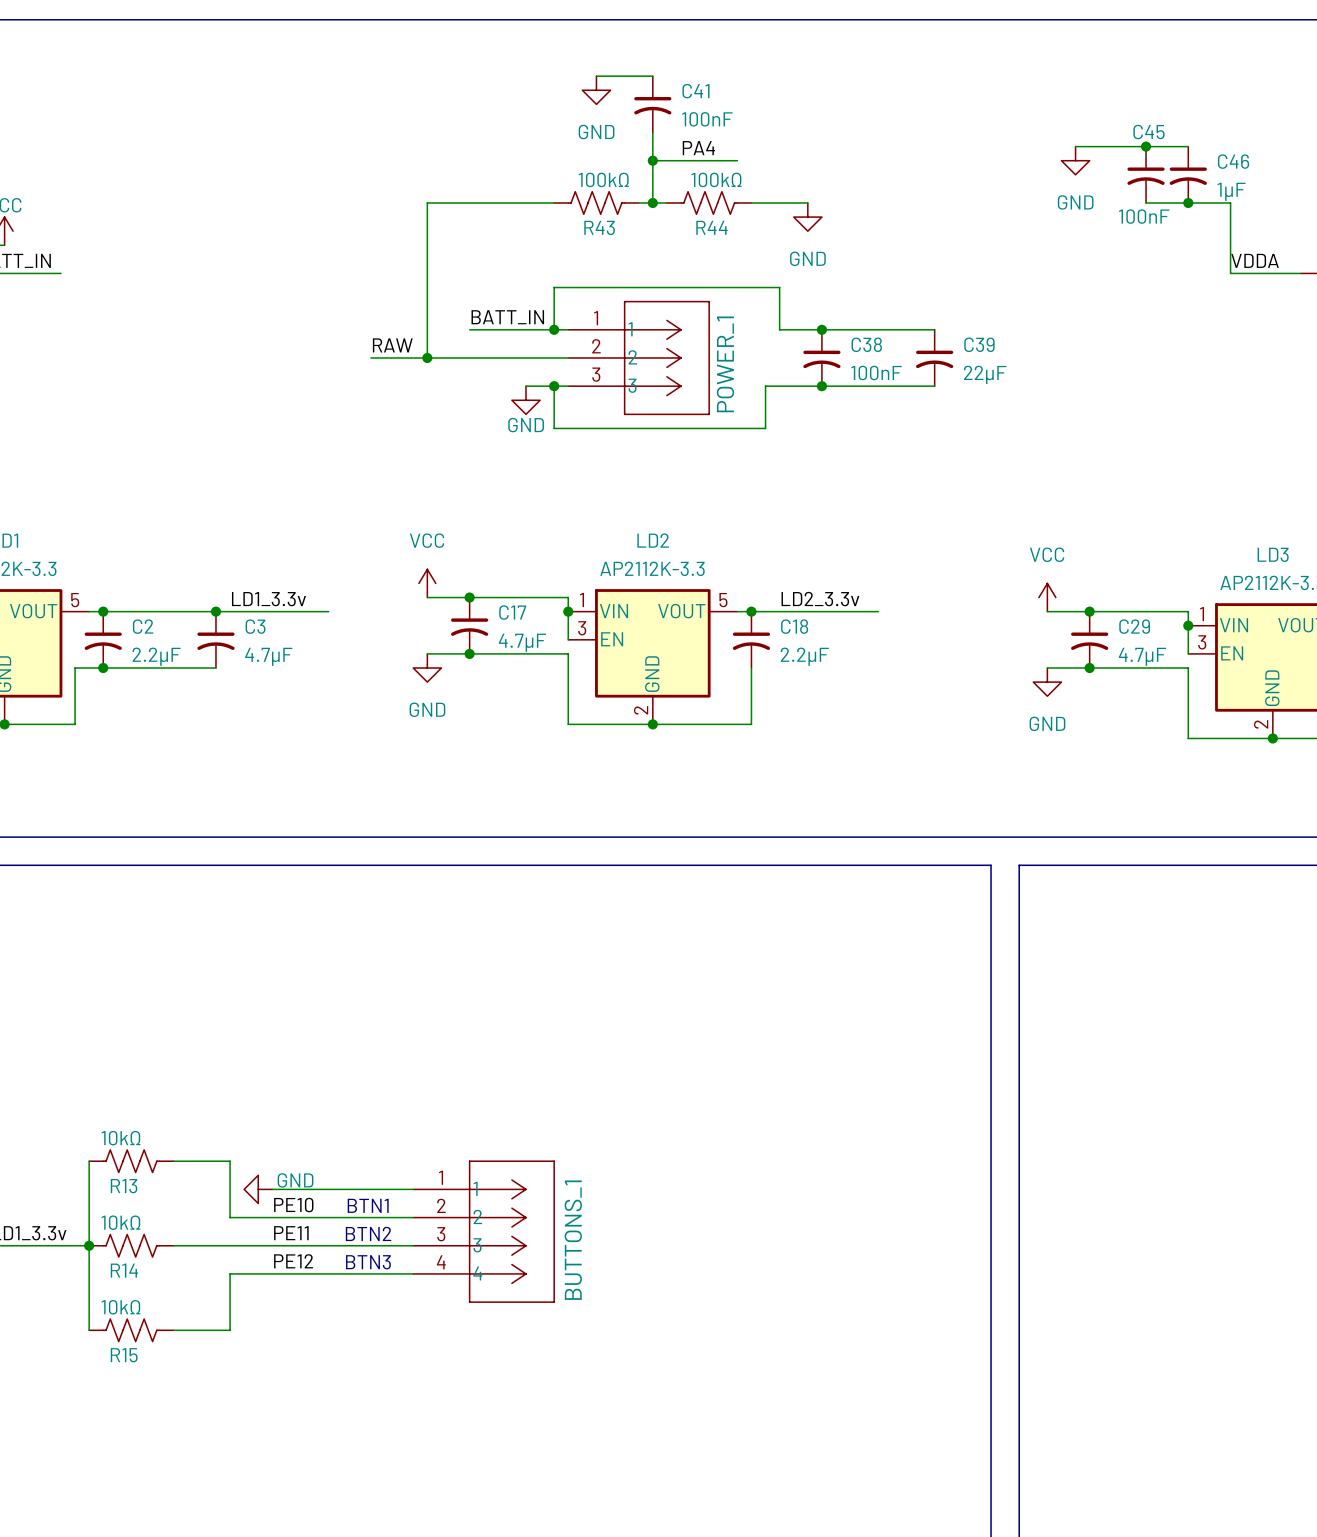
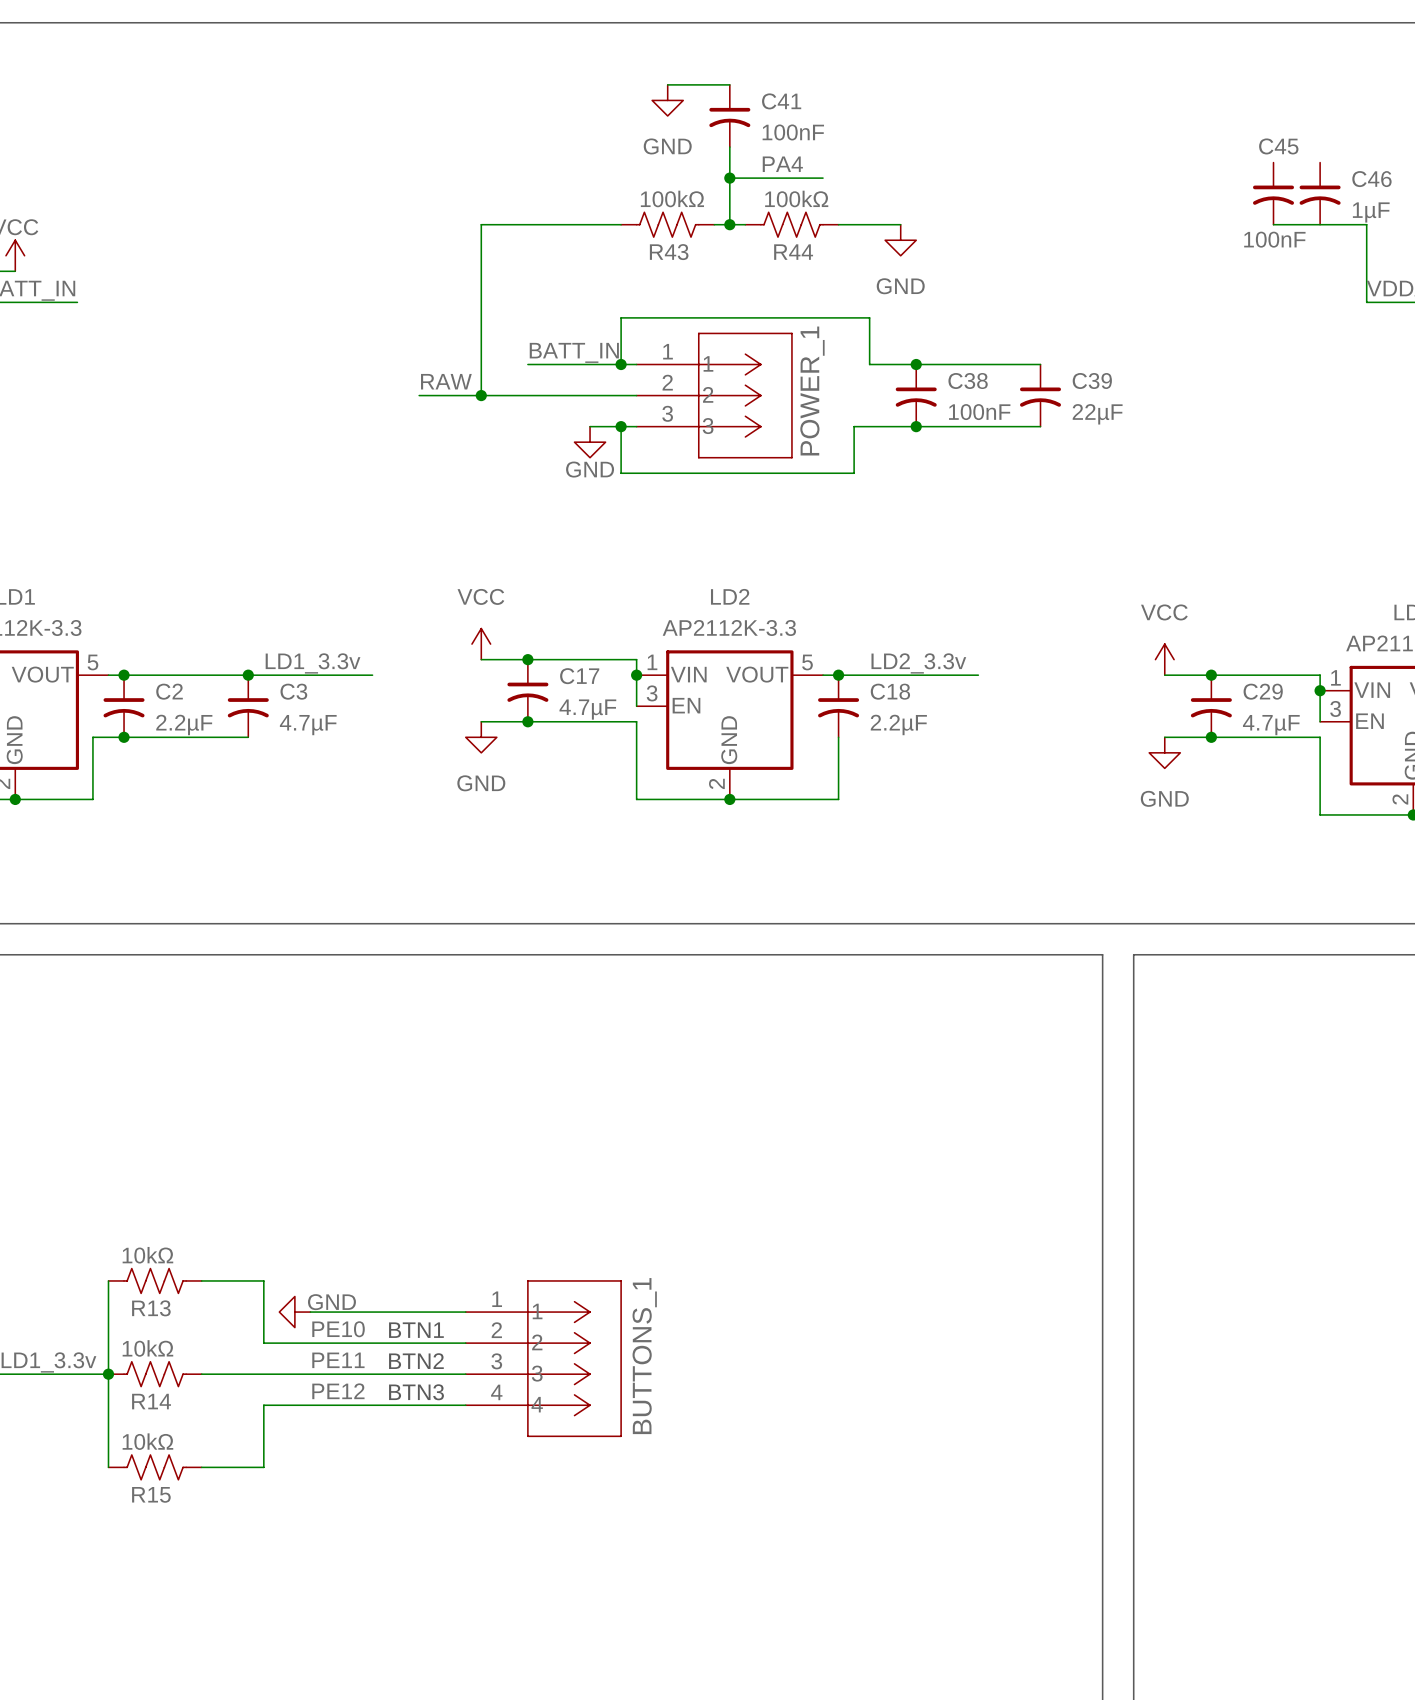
wire: (1075, 146) (1188, 146) -> none
junction: (1146, 146) -> none
power symbol: GND (1075, 160) -> none
junction: (1188, 202) -> none

